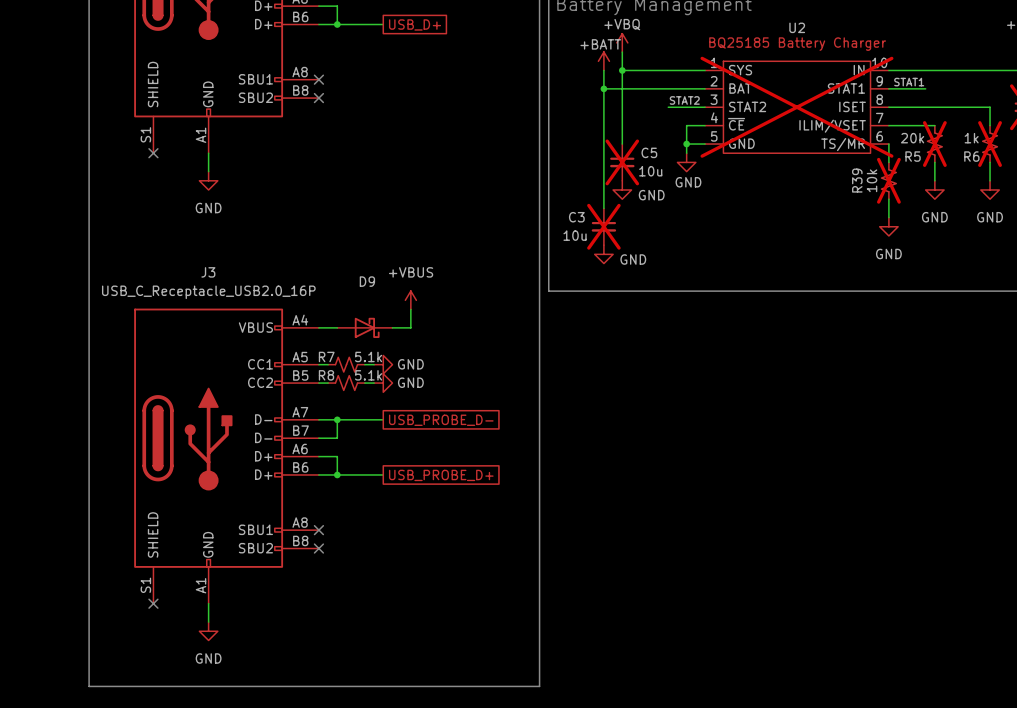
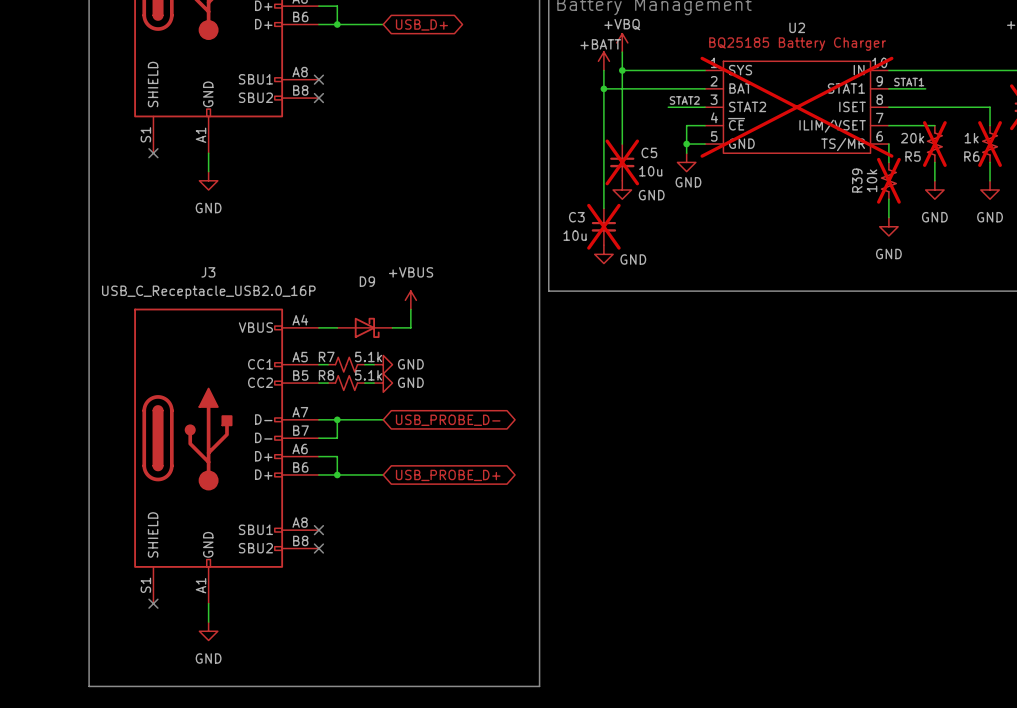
global label shape: passive (415, 24) -> bidirectional (421, 24)
global label shape: passive (441, 420) -> bidirectional (448, 420)
global label shape: passive (441, 475) -> bidirectional (448, 475)

